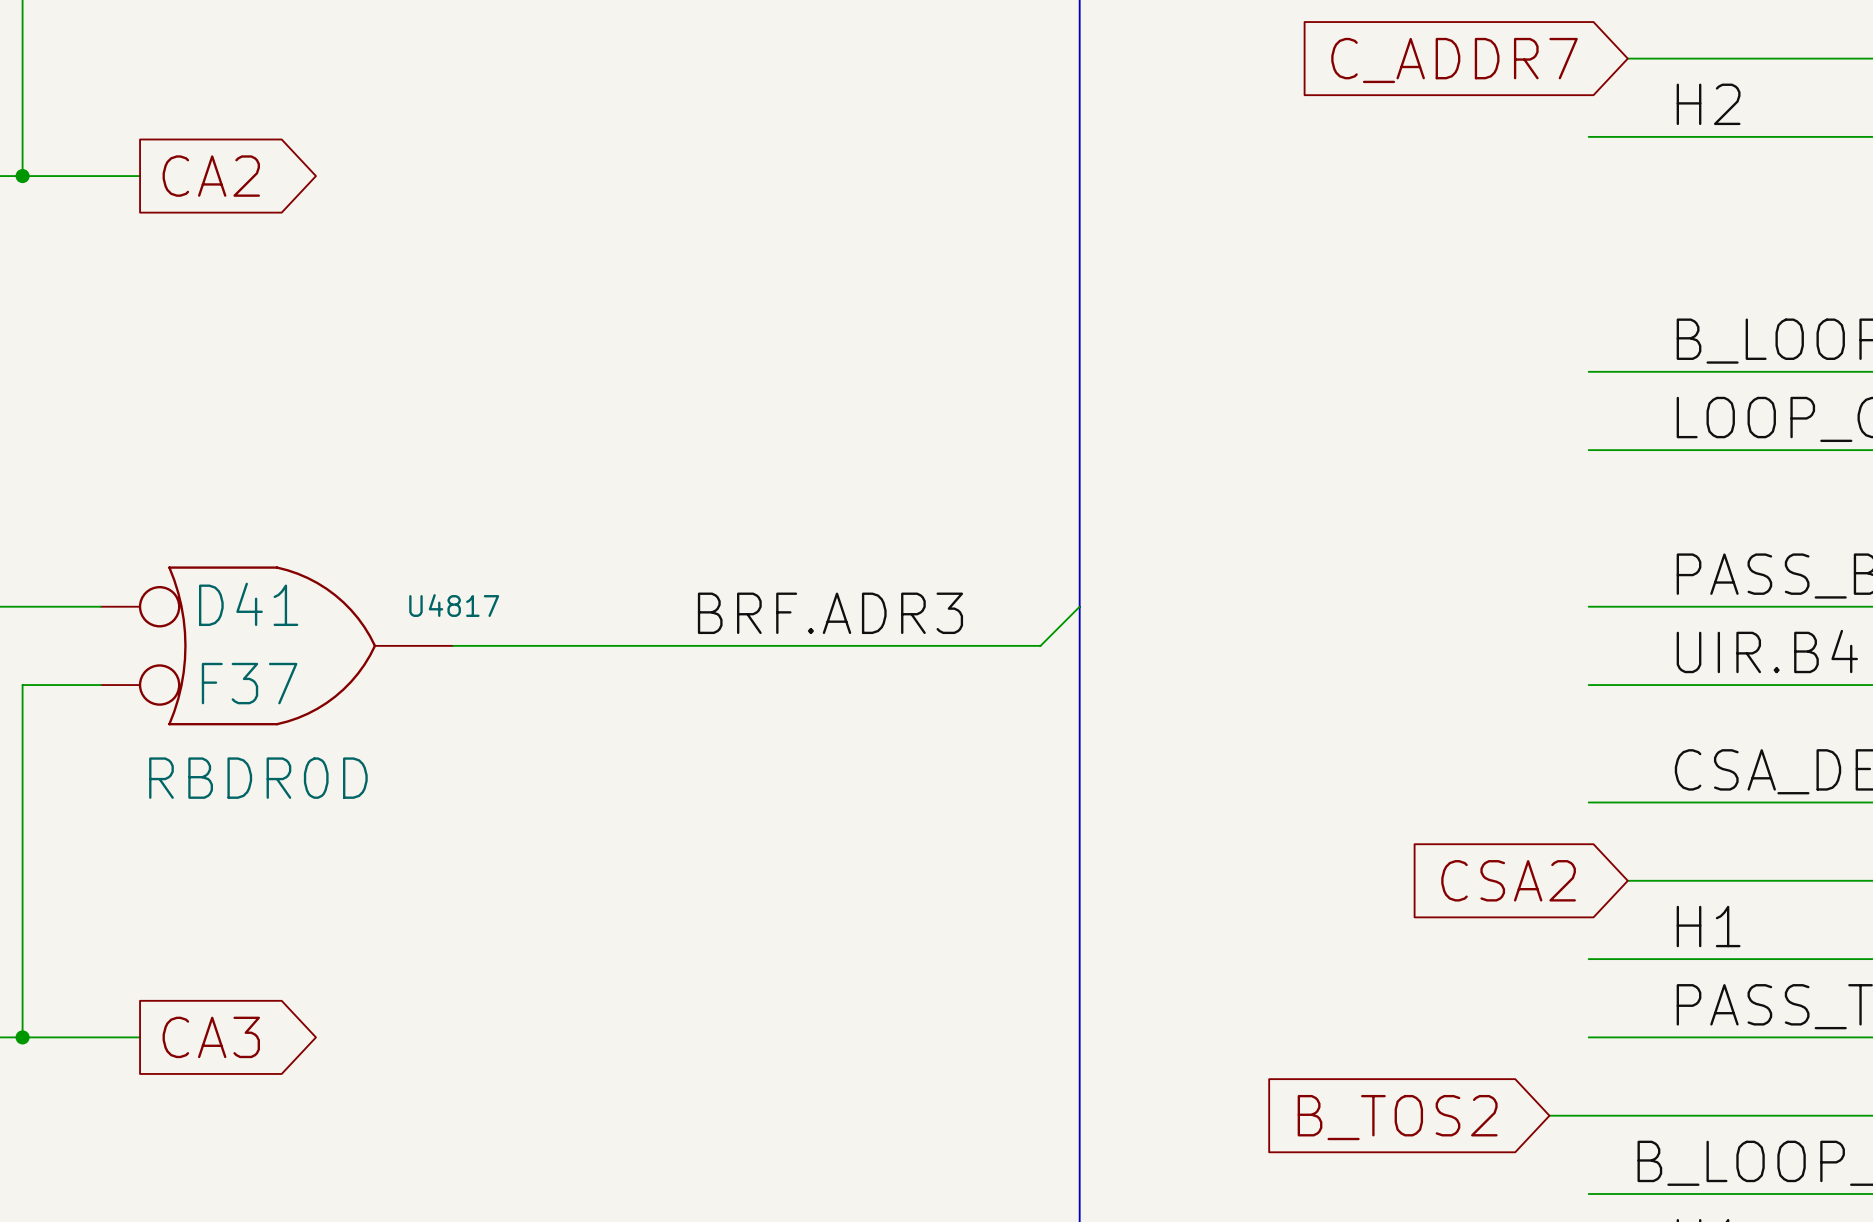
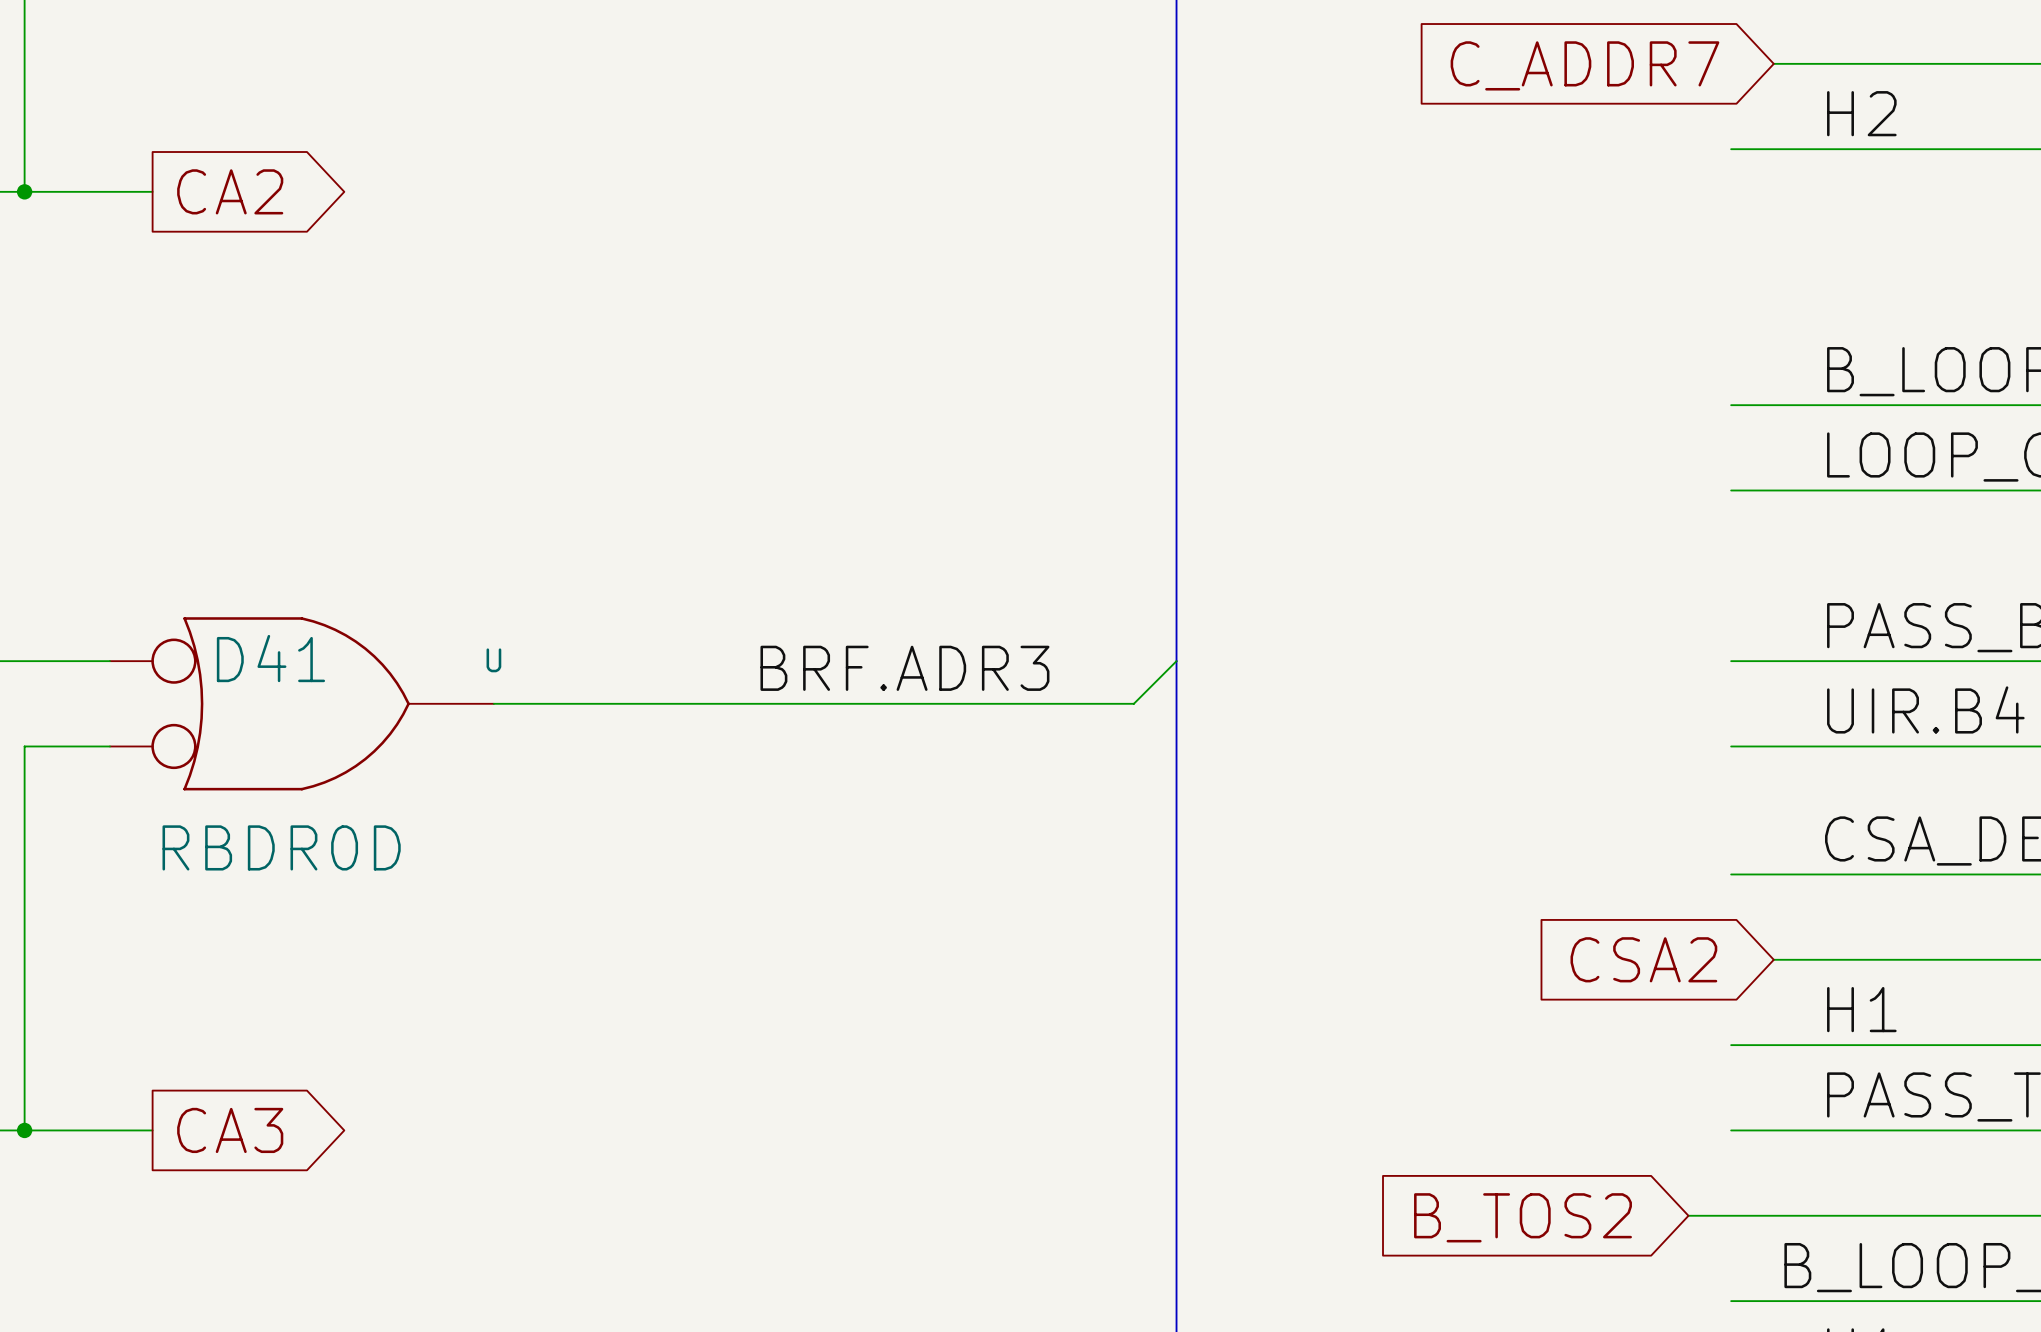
U4817 name: U4817 (454, 605) -> U (493, 660)
U4817 value: F37 (249, 683) -> none

